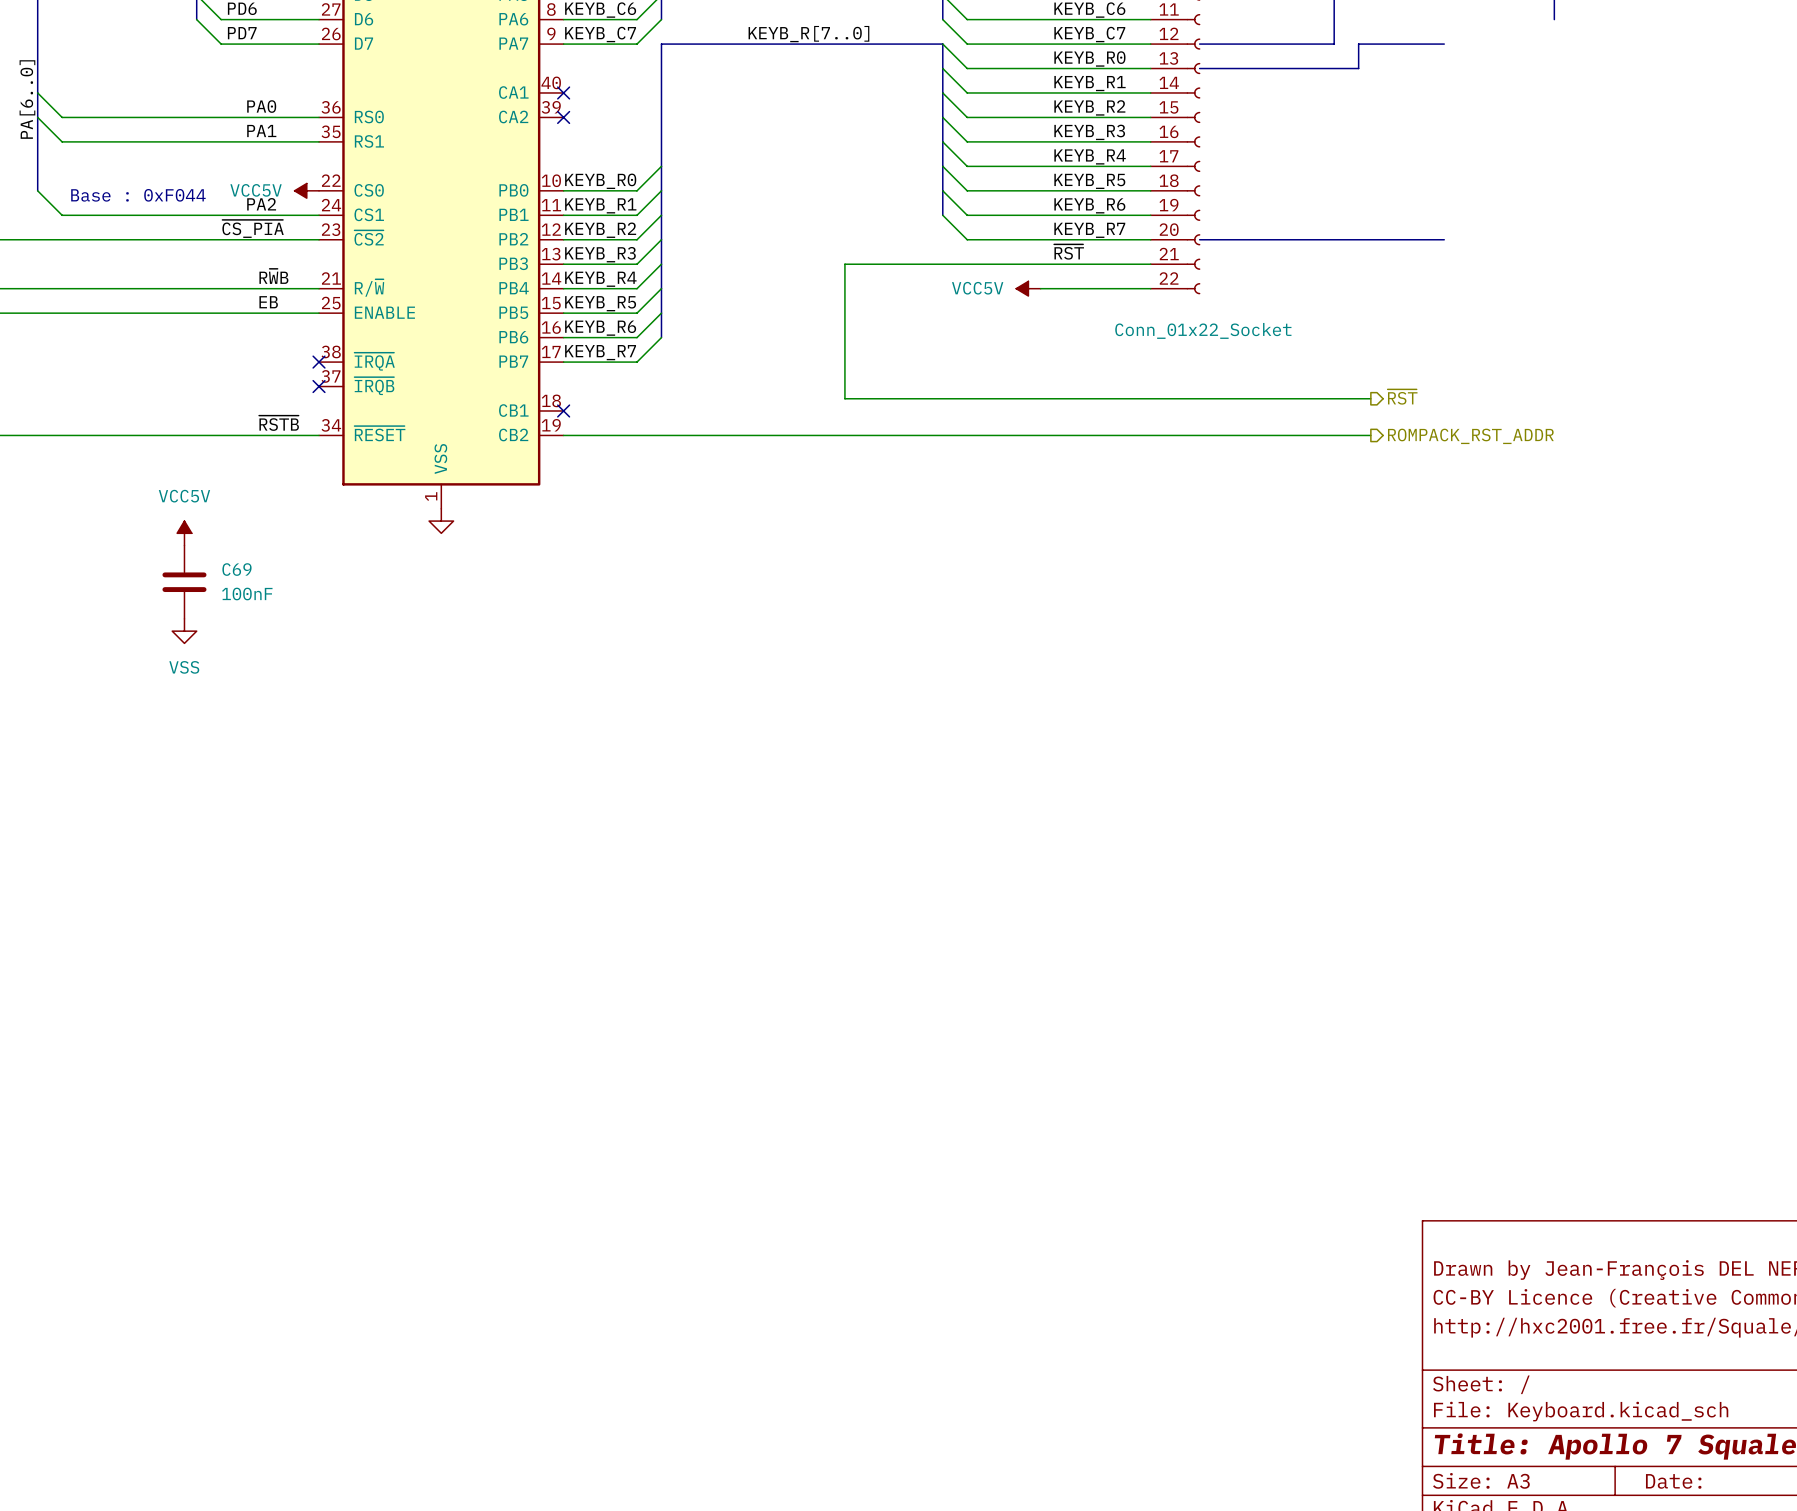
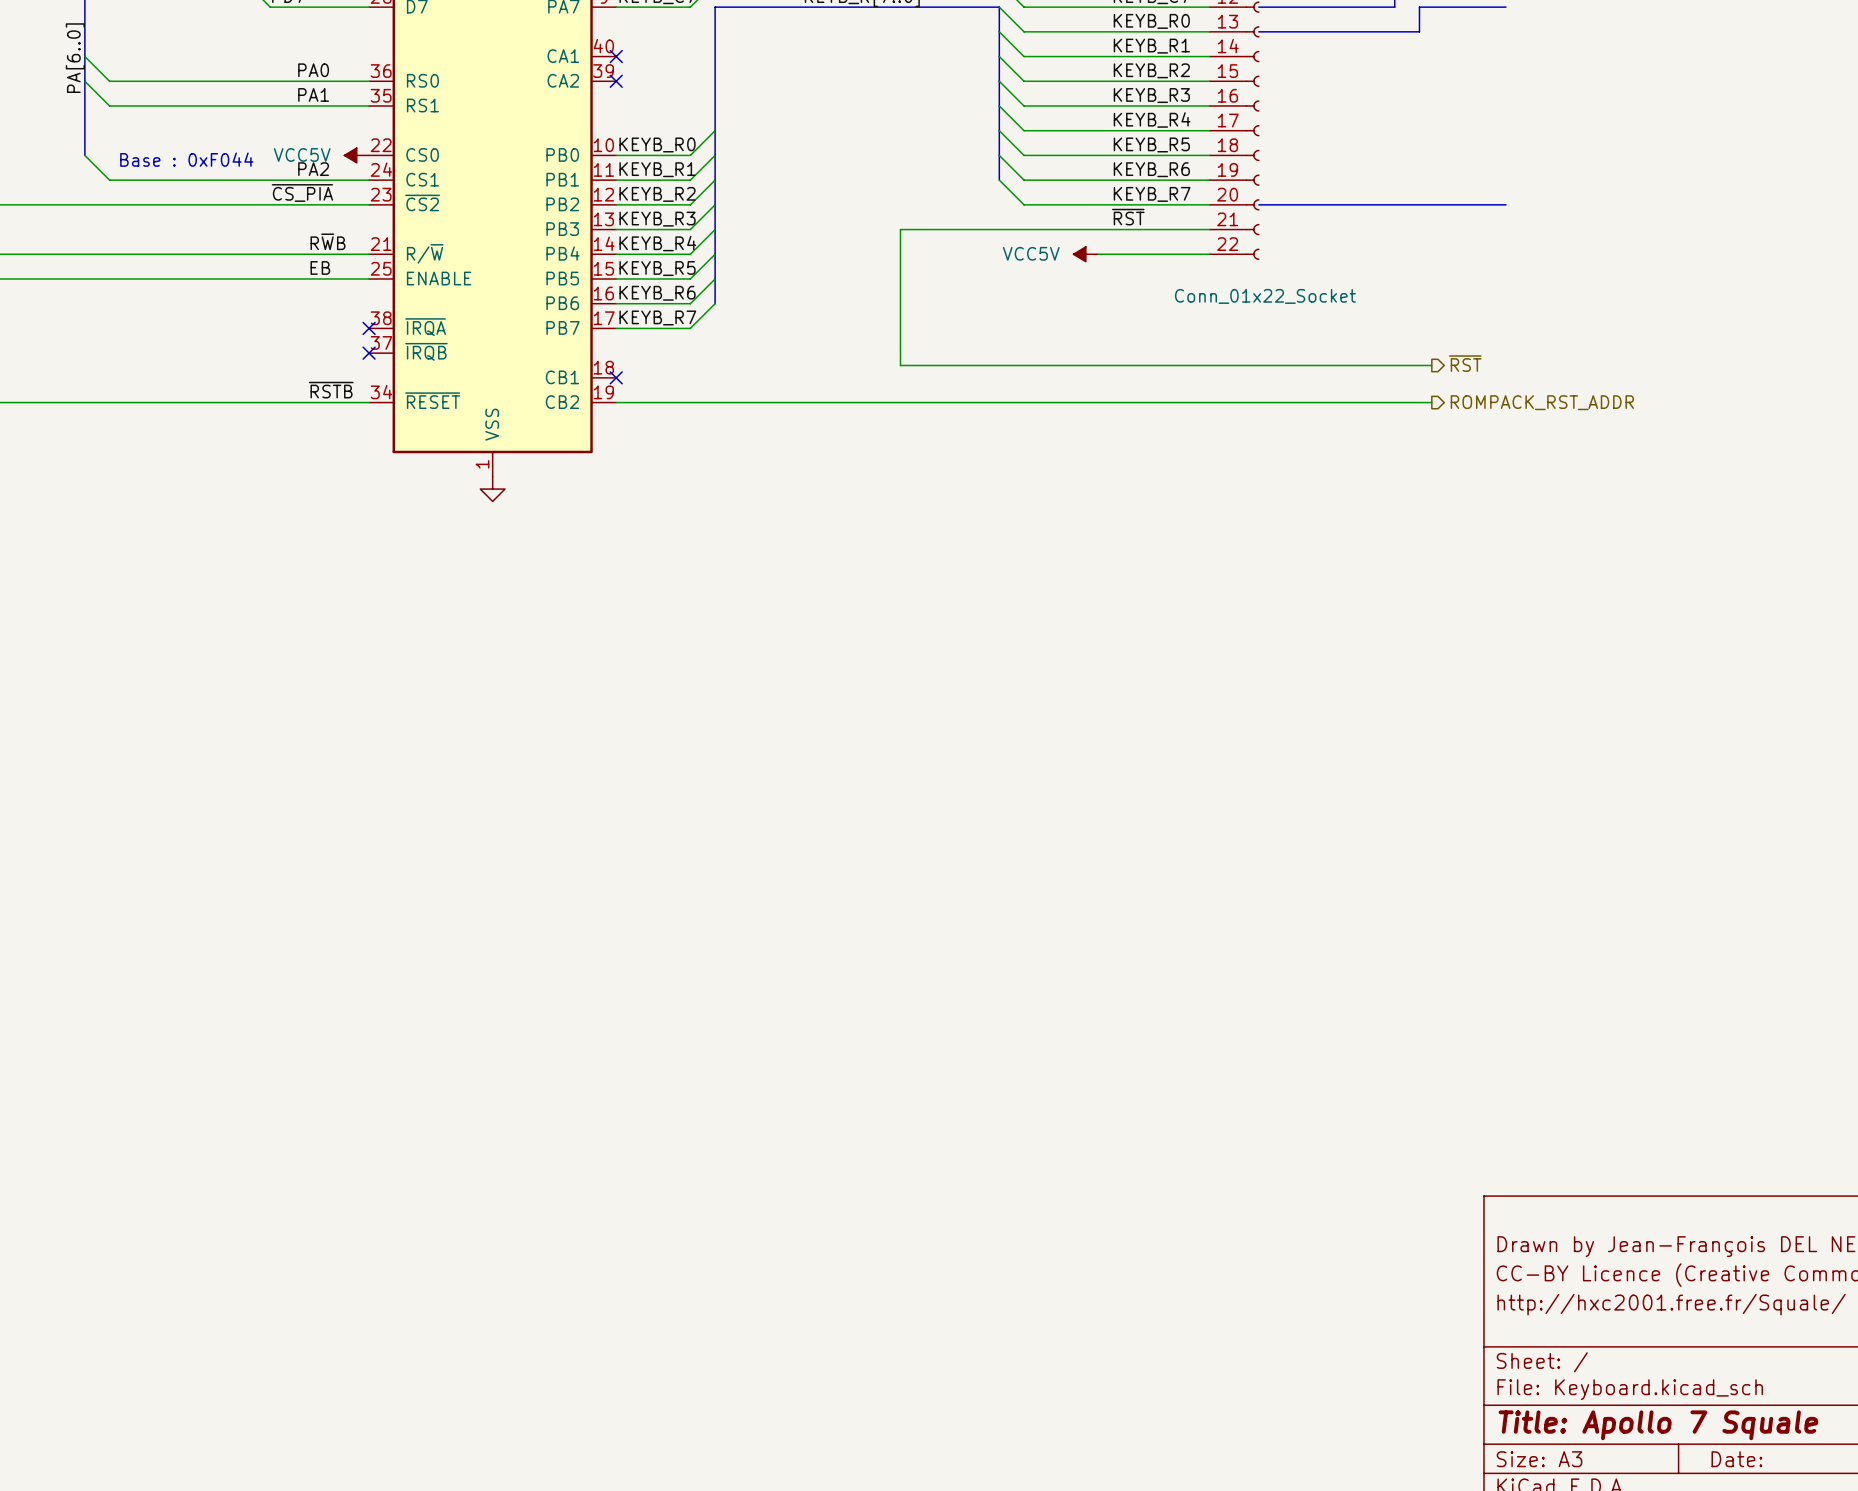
power symbol: VCC5V (184, 533) -> none
C69: 100nF (184, 582) -> none
power symbol: VSS (184, 631) -> none

